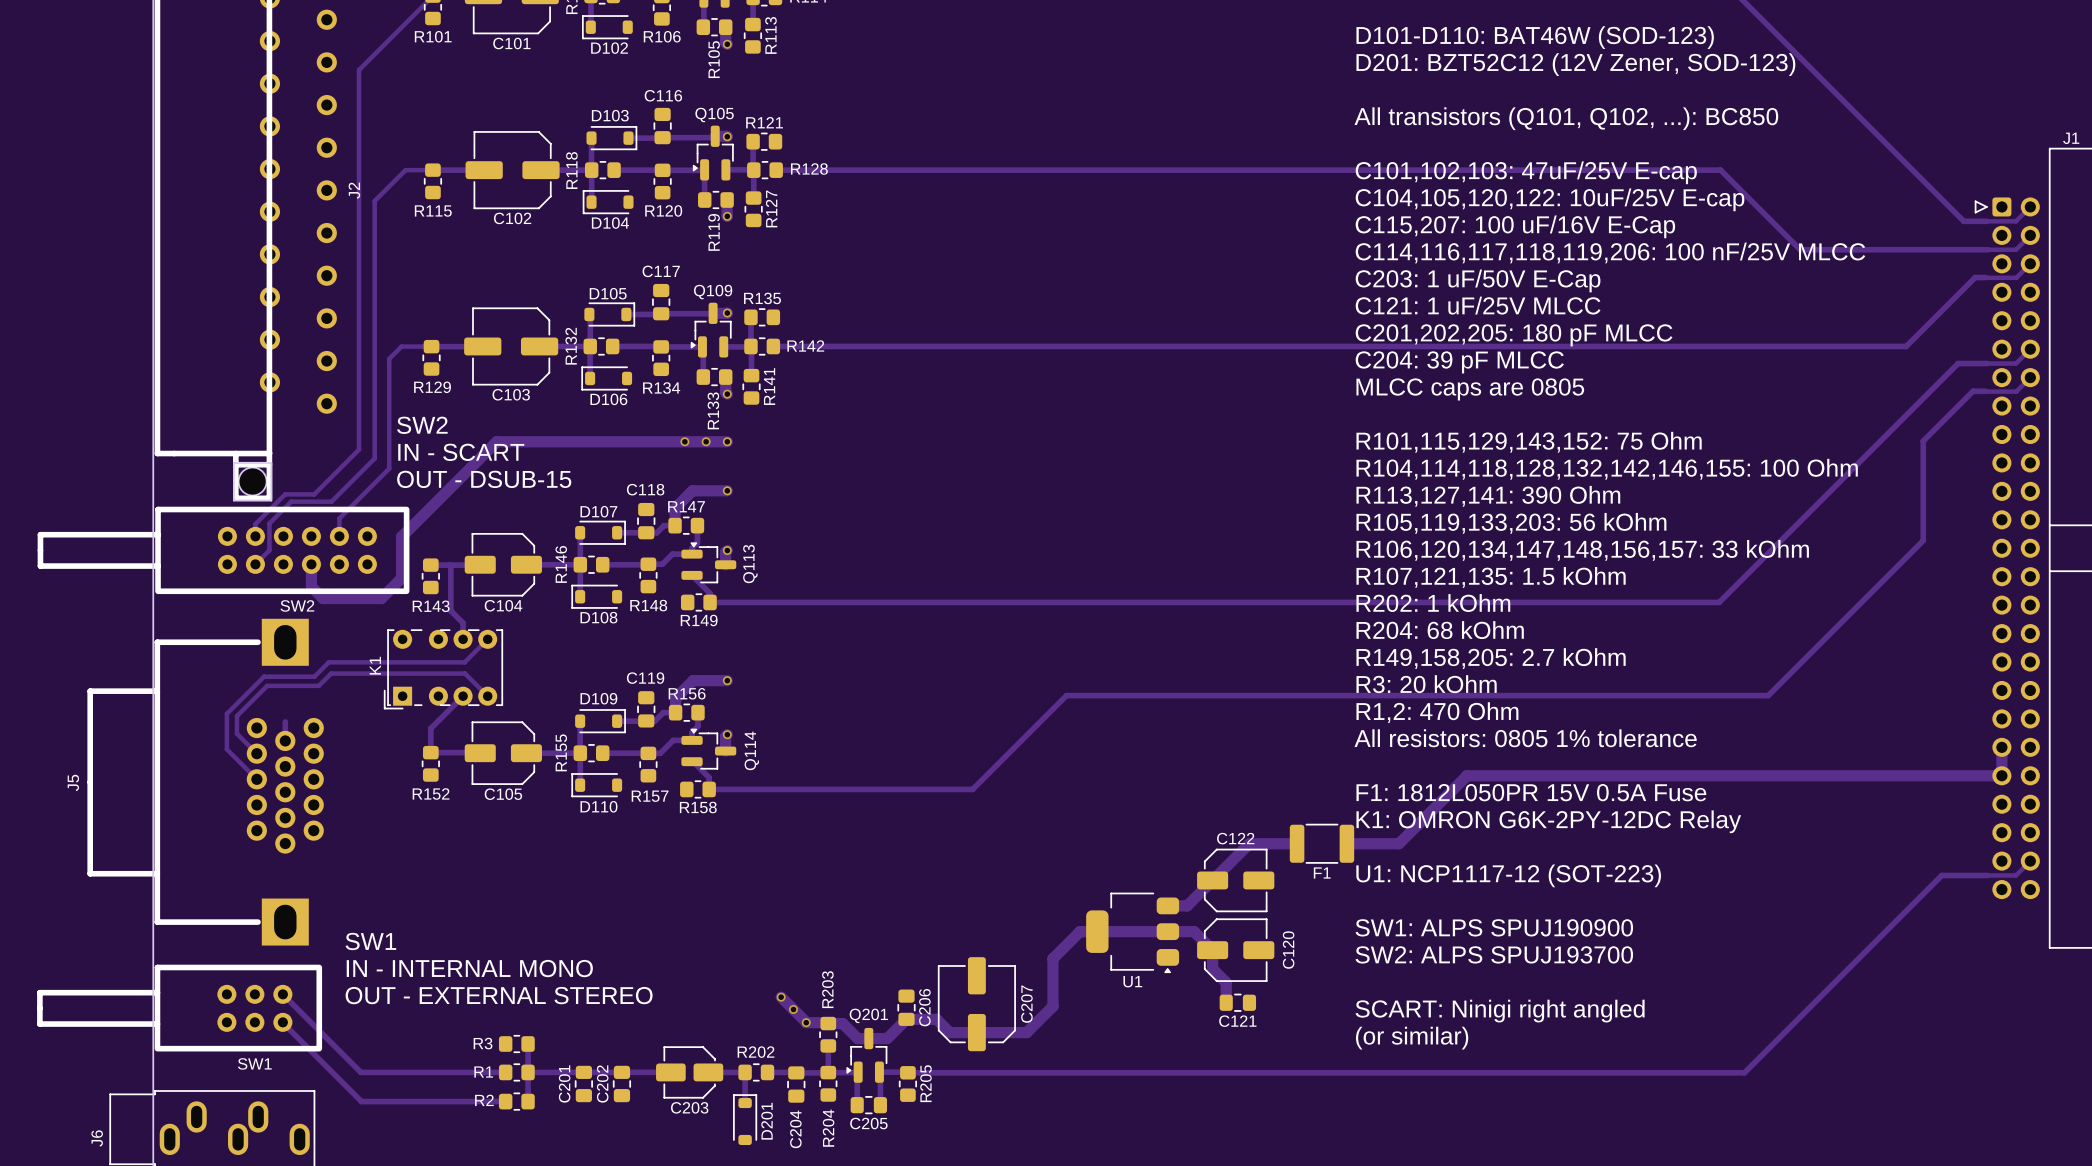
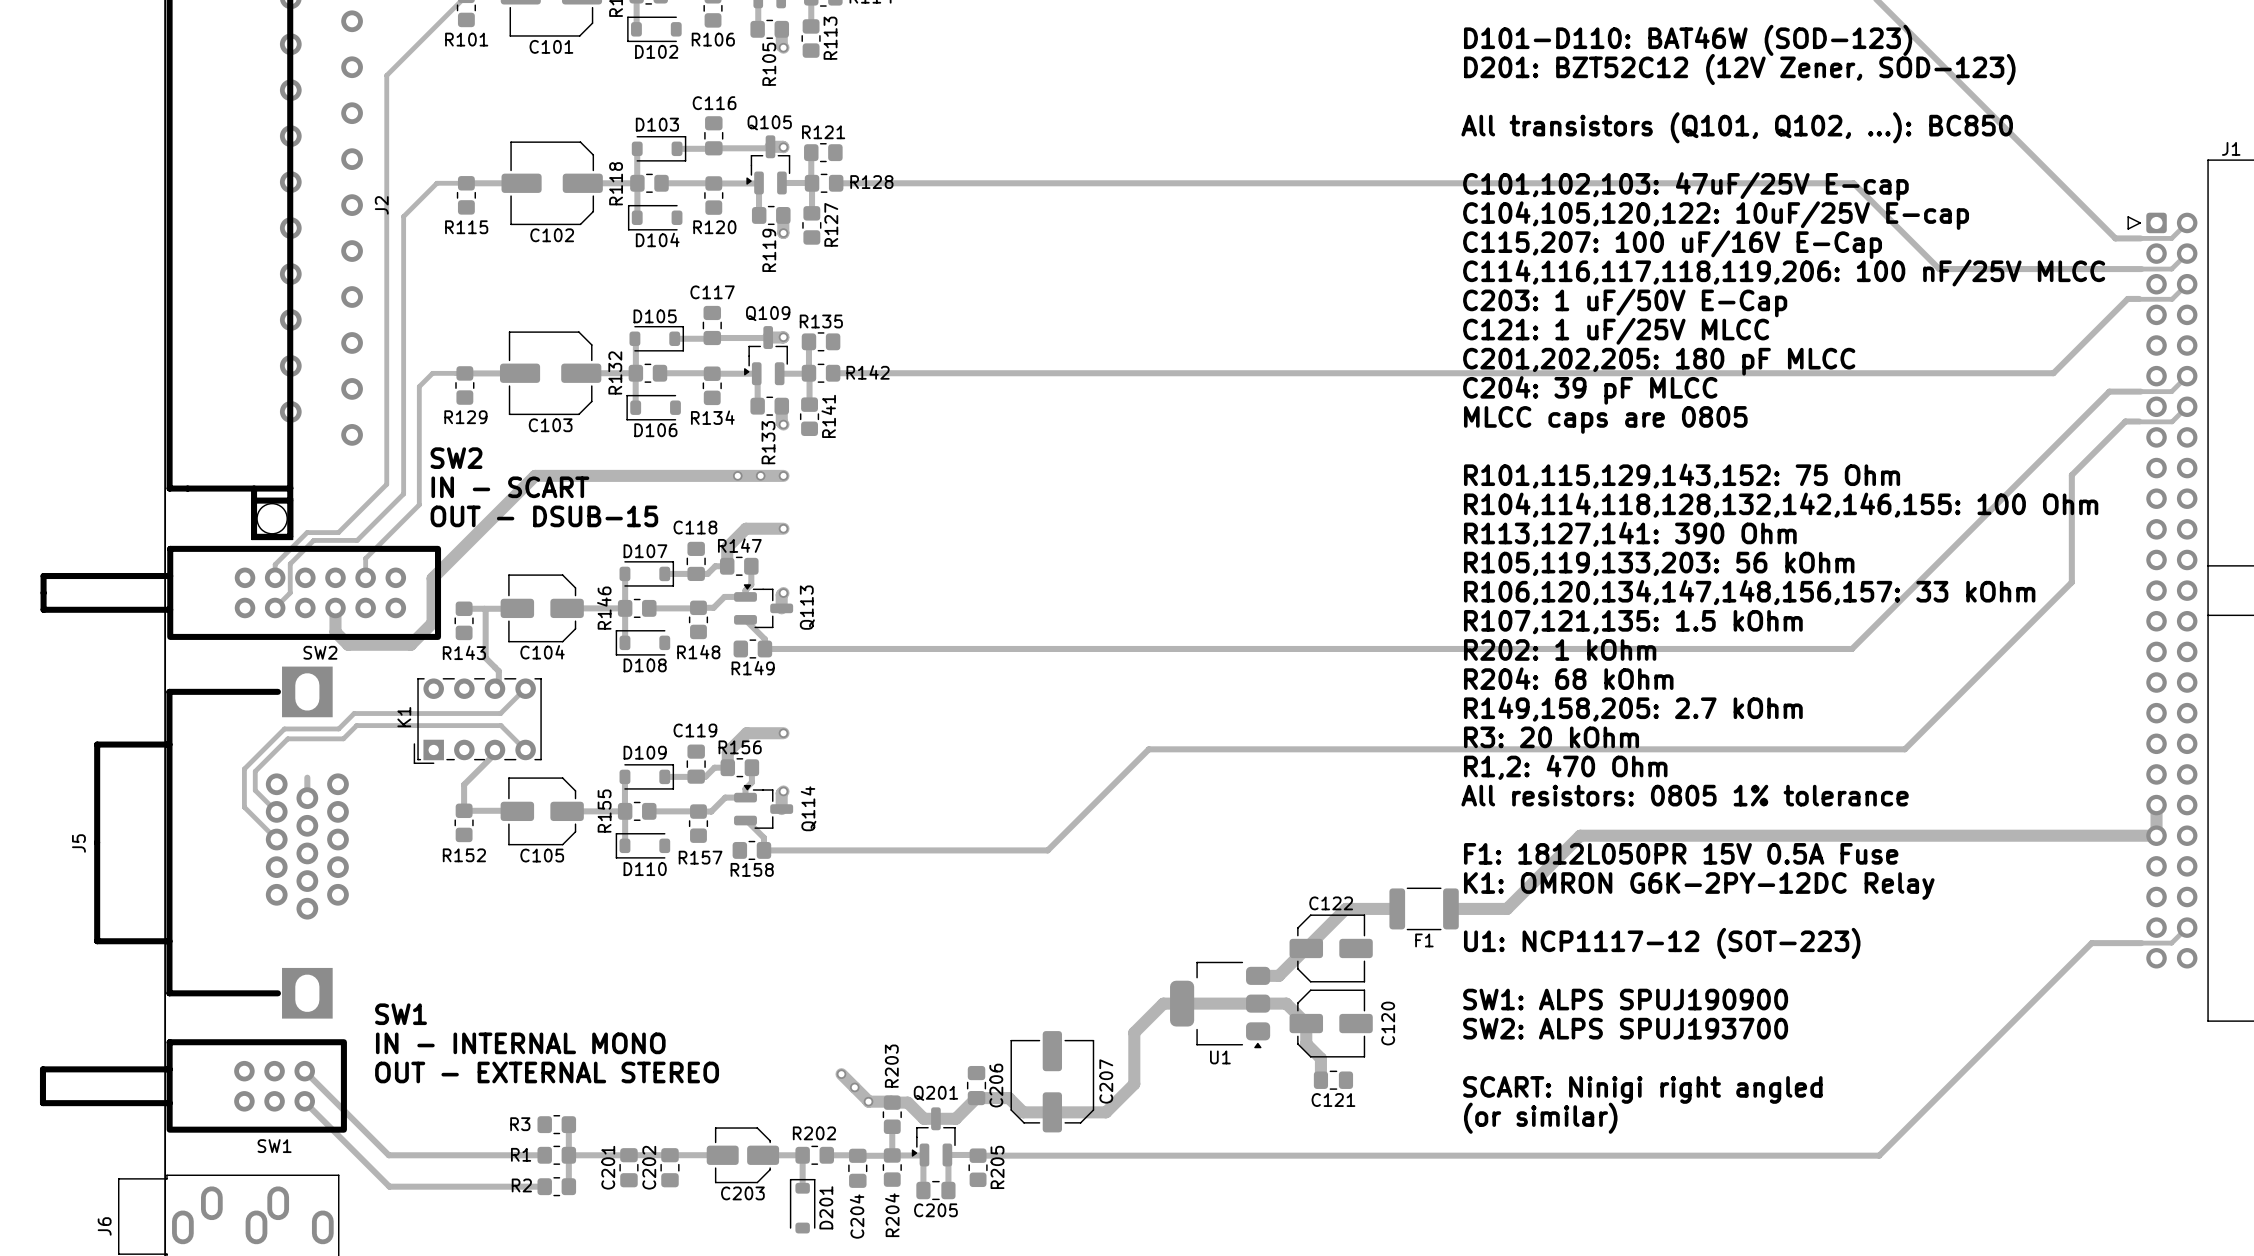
K1 footprint: [384, 629, 503, 710] -> [413, 678, 542, 764]

